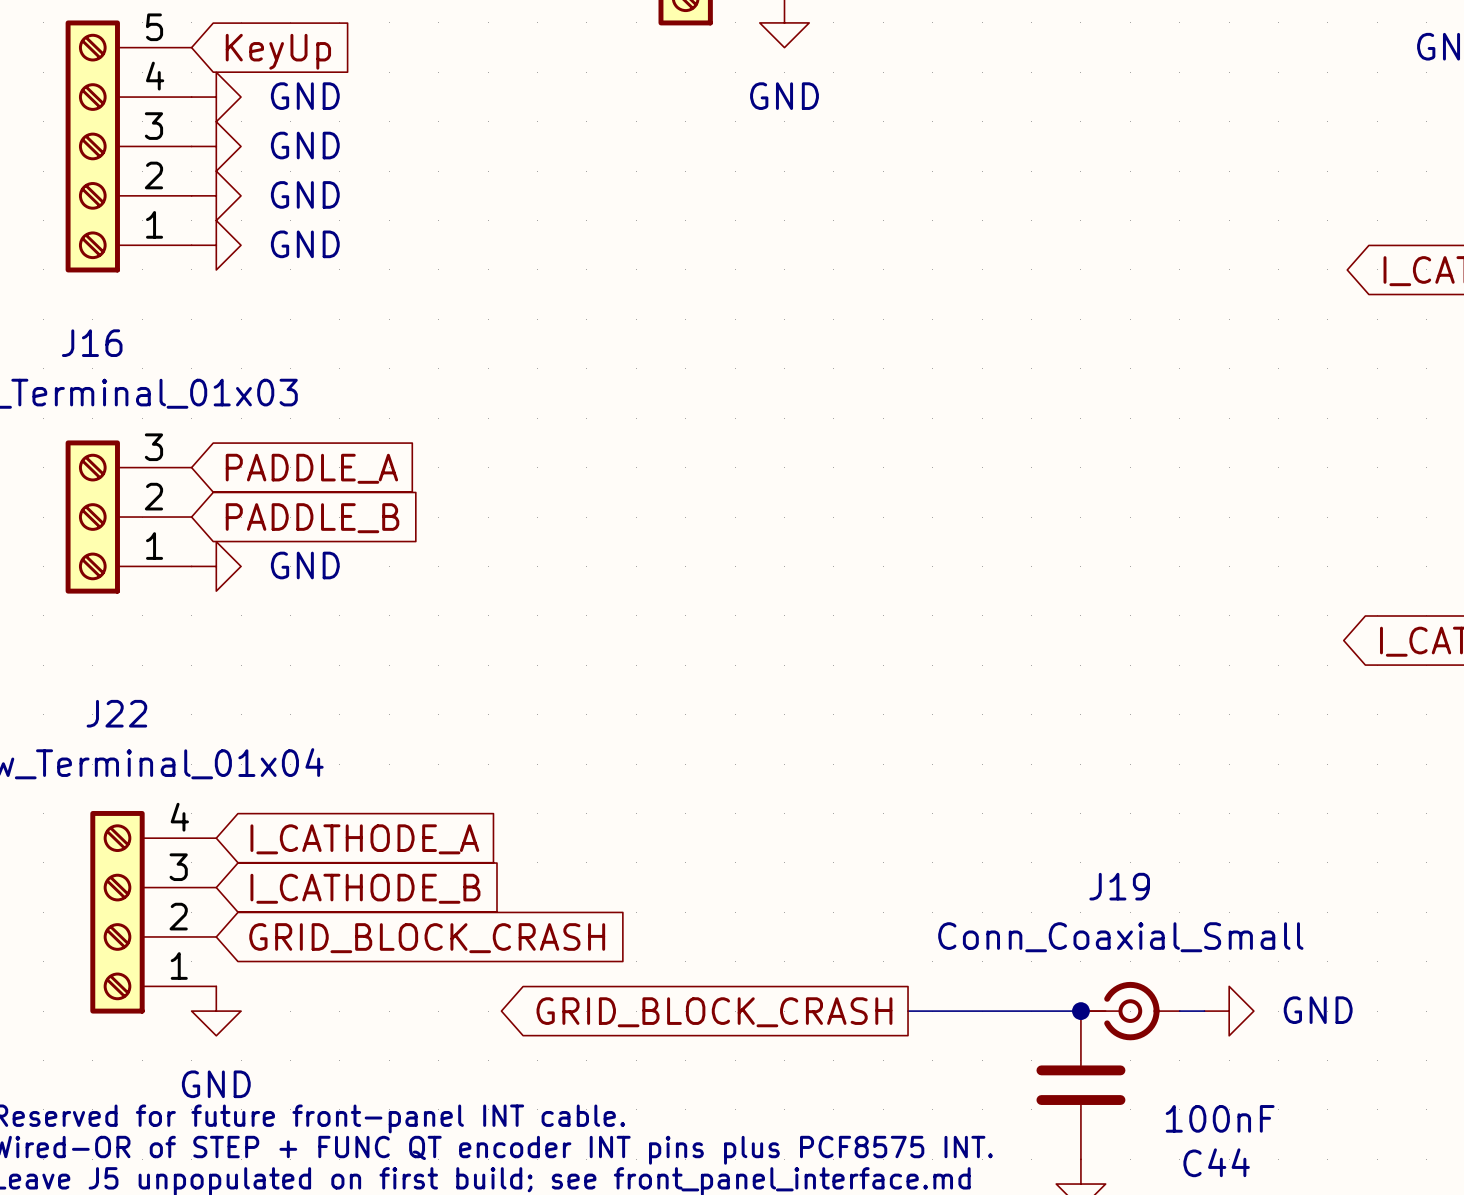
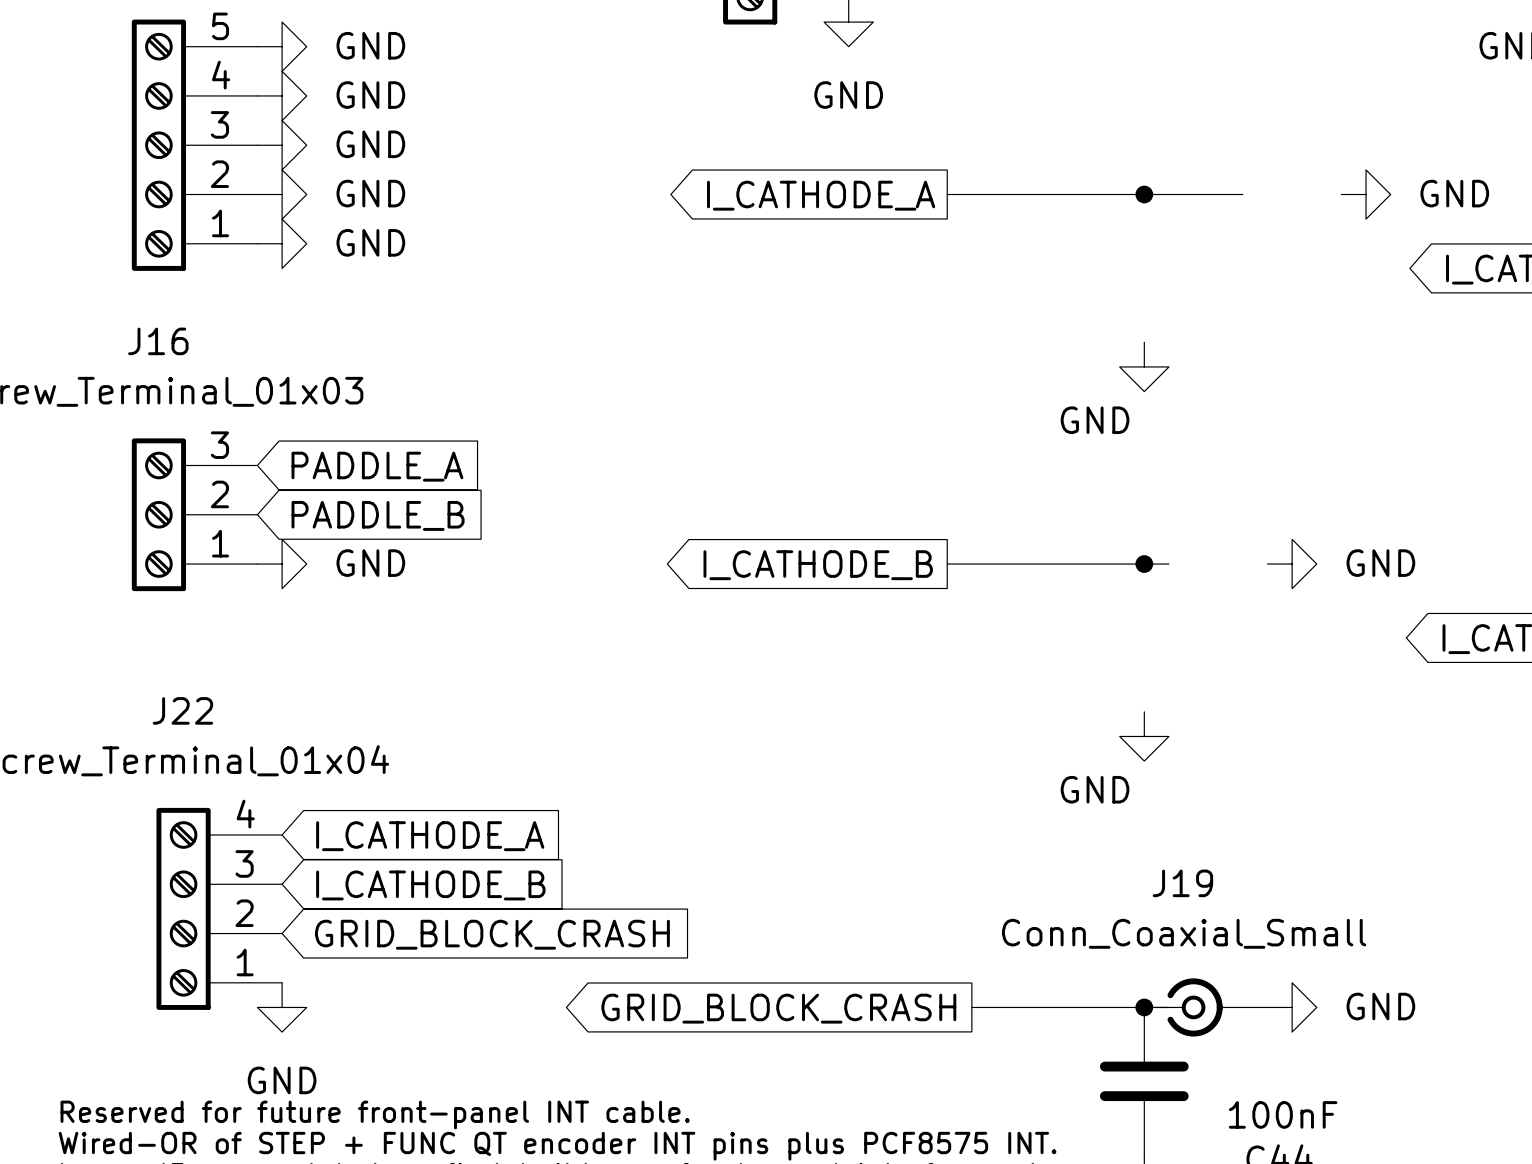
power symbol: none -> GND (282, 46)
global label: KeyUp (278, 51) -> none
wire: none -> (947, 194) (1242, 194)
junction: none -> (1144, 194)
power symbol: none -> GND (1366, 194)
global label: none -> I_CATHODE_A (821, 195)
power symbol: none -> GND (1144, 366)
wire: none -> (947, 564) (1168, 564)
junction: none -> (1144, 564)
power symbol: none -> GND (1292, 564)
global label: none -> I_CATHODE_B (818, 565)
power symbol: none -> GND (1144, 736)

